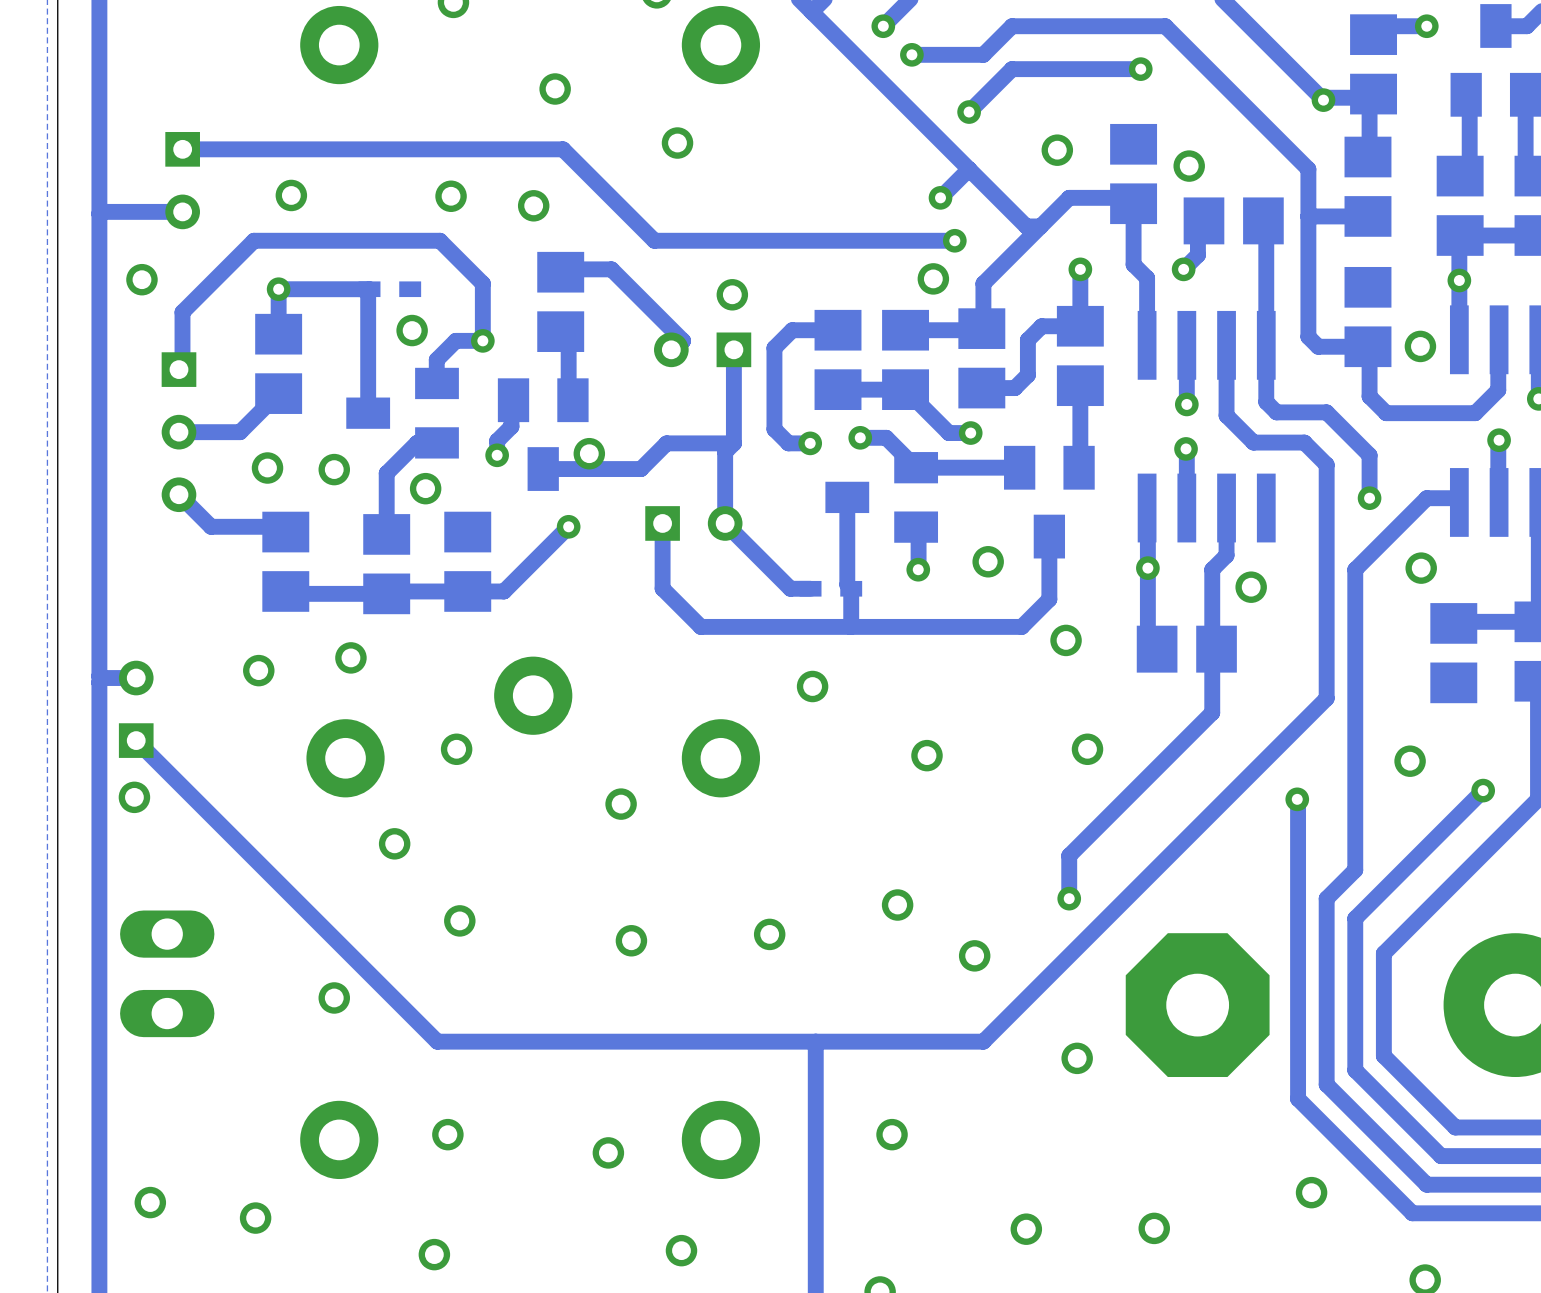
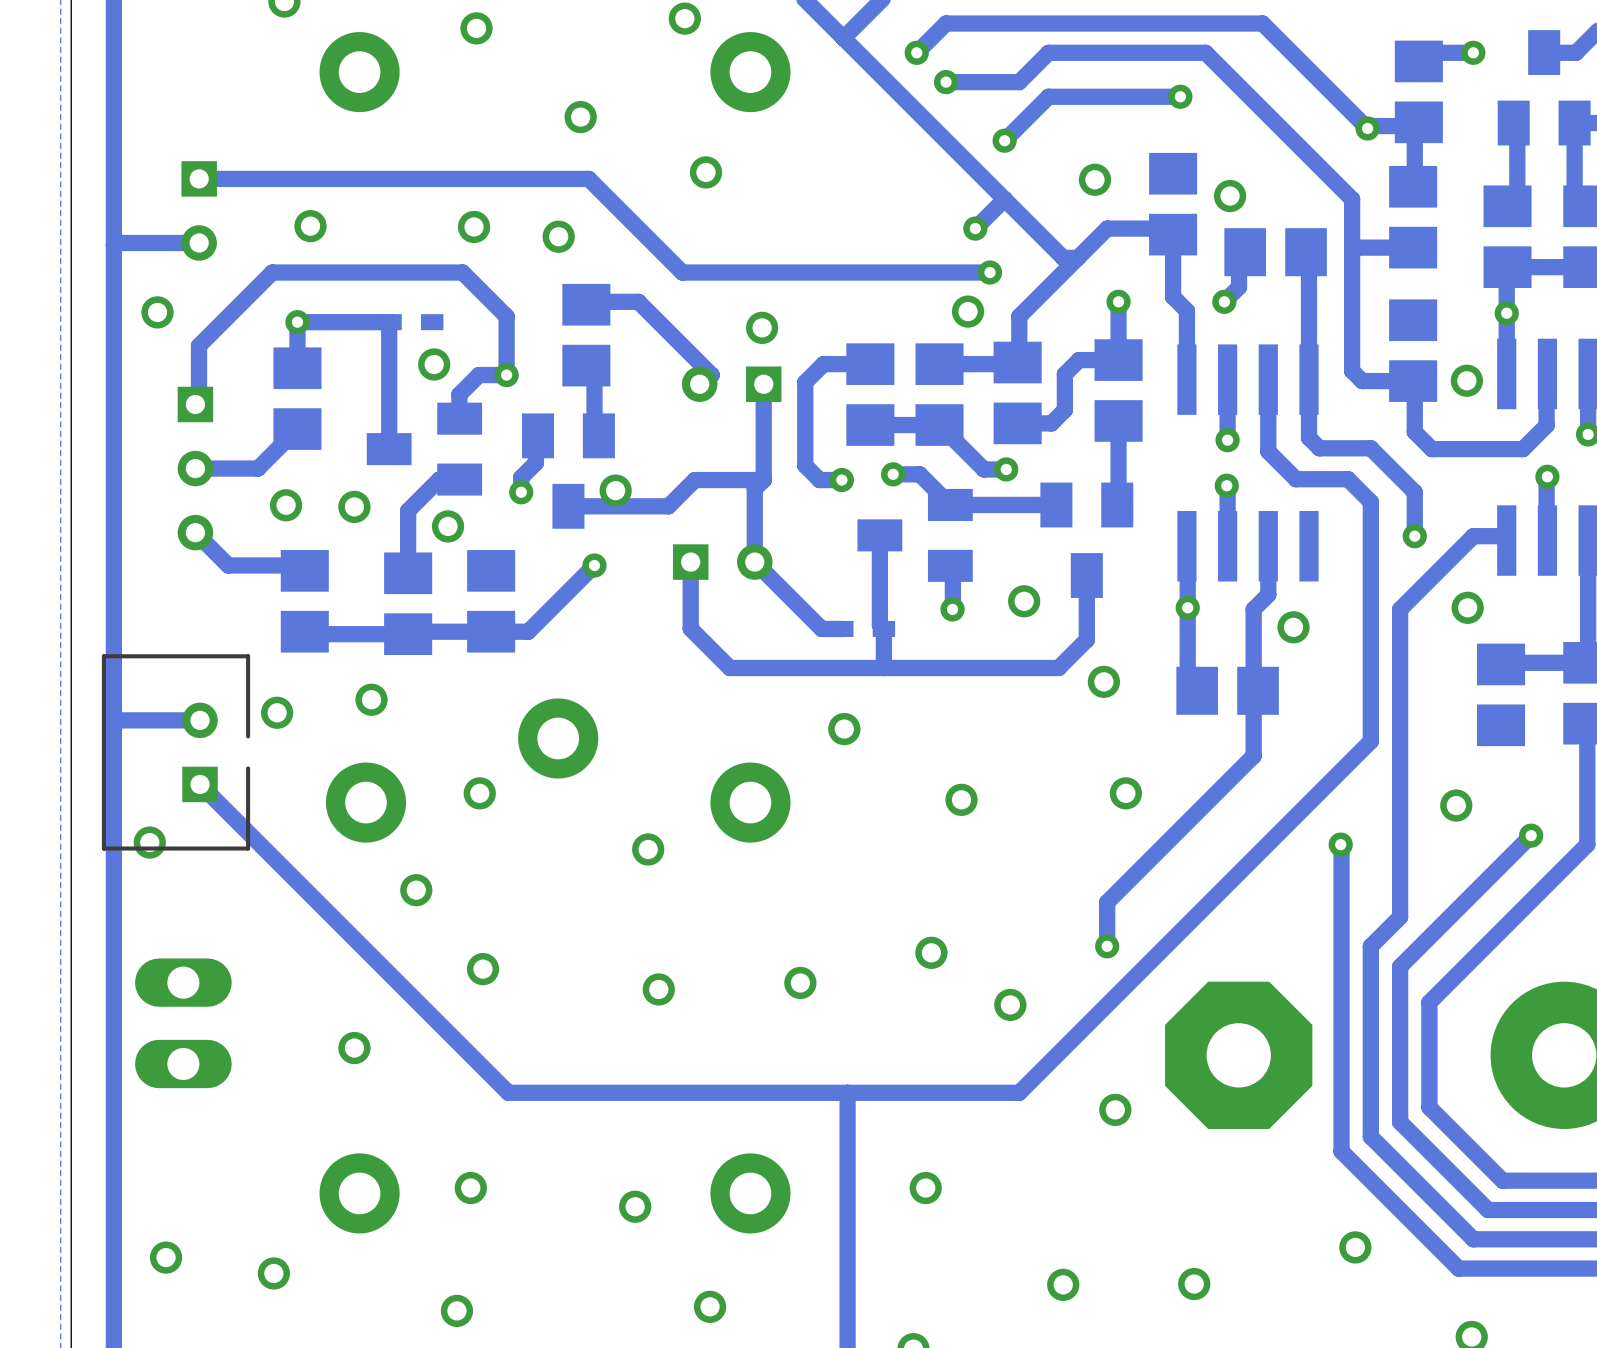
track: none -> (200, 720) (151, 720)
part side: top (136, 709) -> bottom (176, 752)
track: (136, 740) (437, 1041) (484, 1041) -> (200, 784) (508, 1092)

